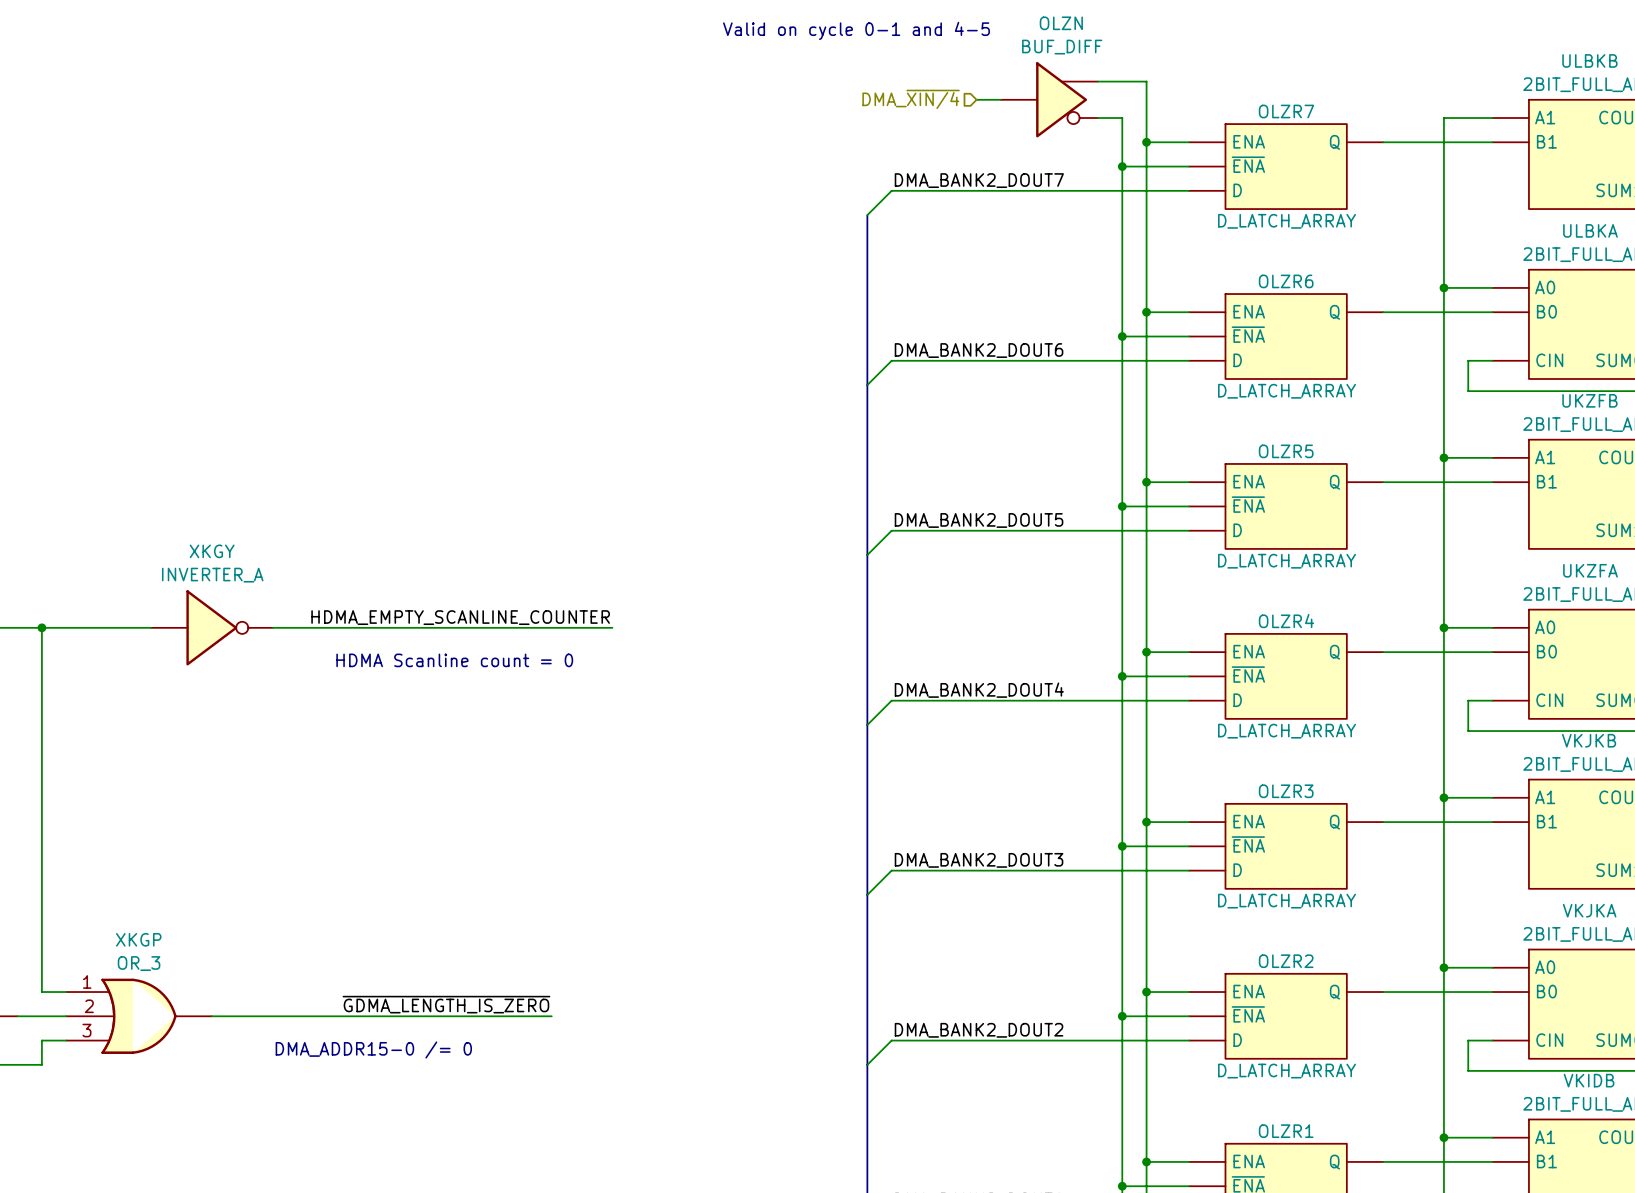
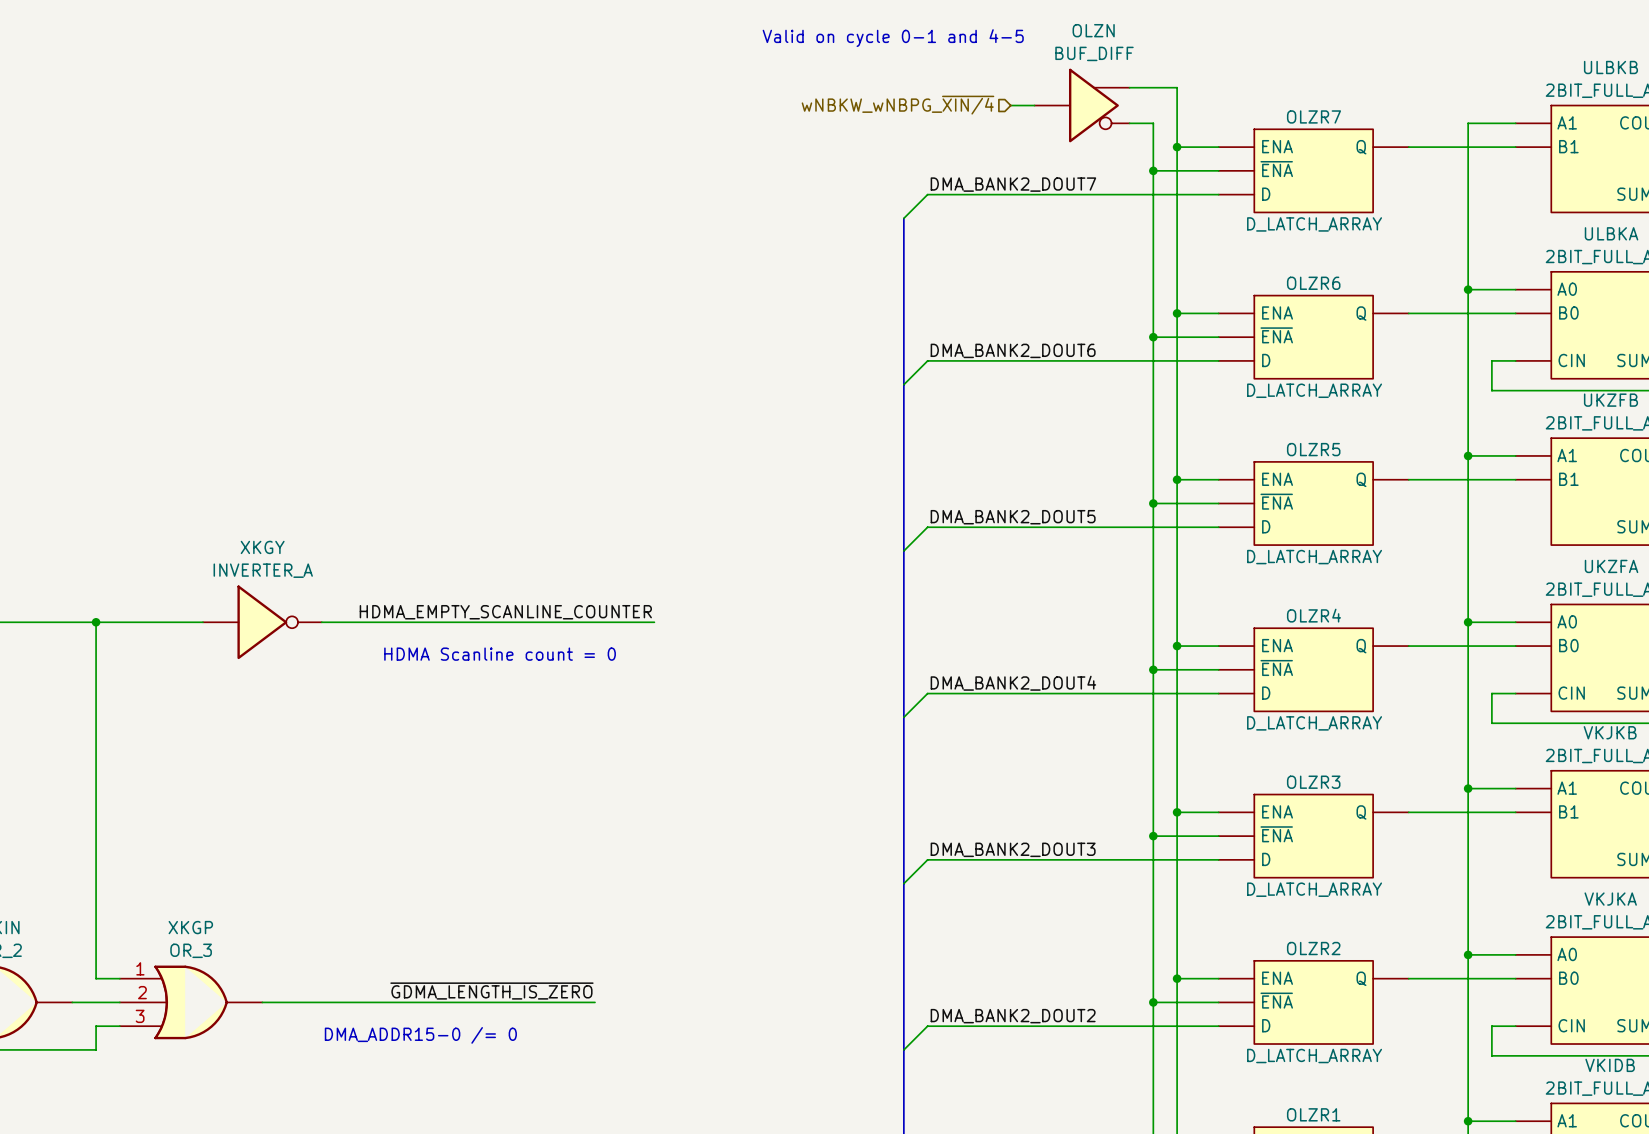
hierarchical label: DMA_~{XIN/4} (911, 99) -> wNBKW_wNBPG_~{XIN/4} (897, 105)

